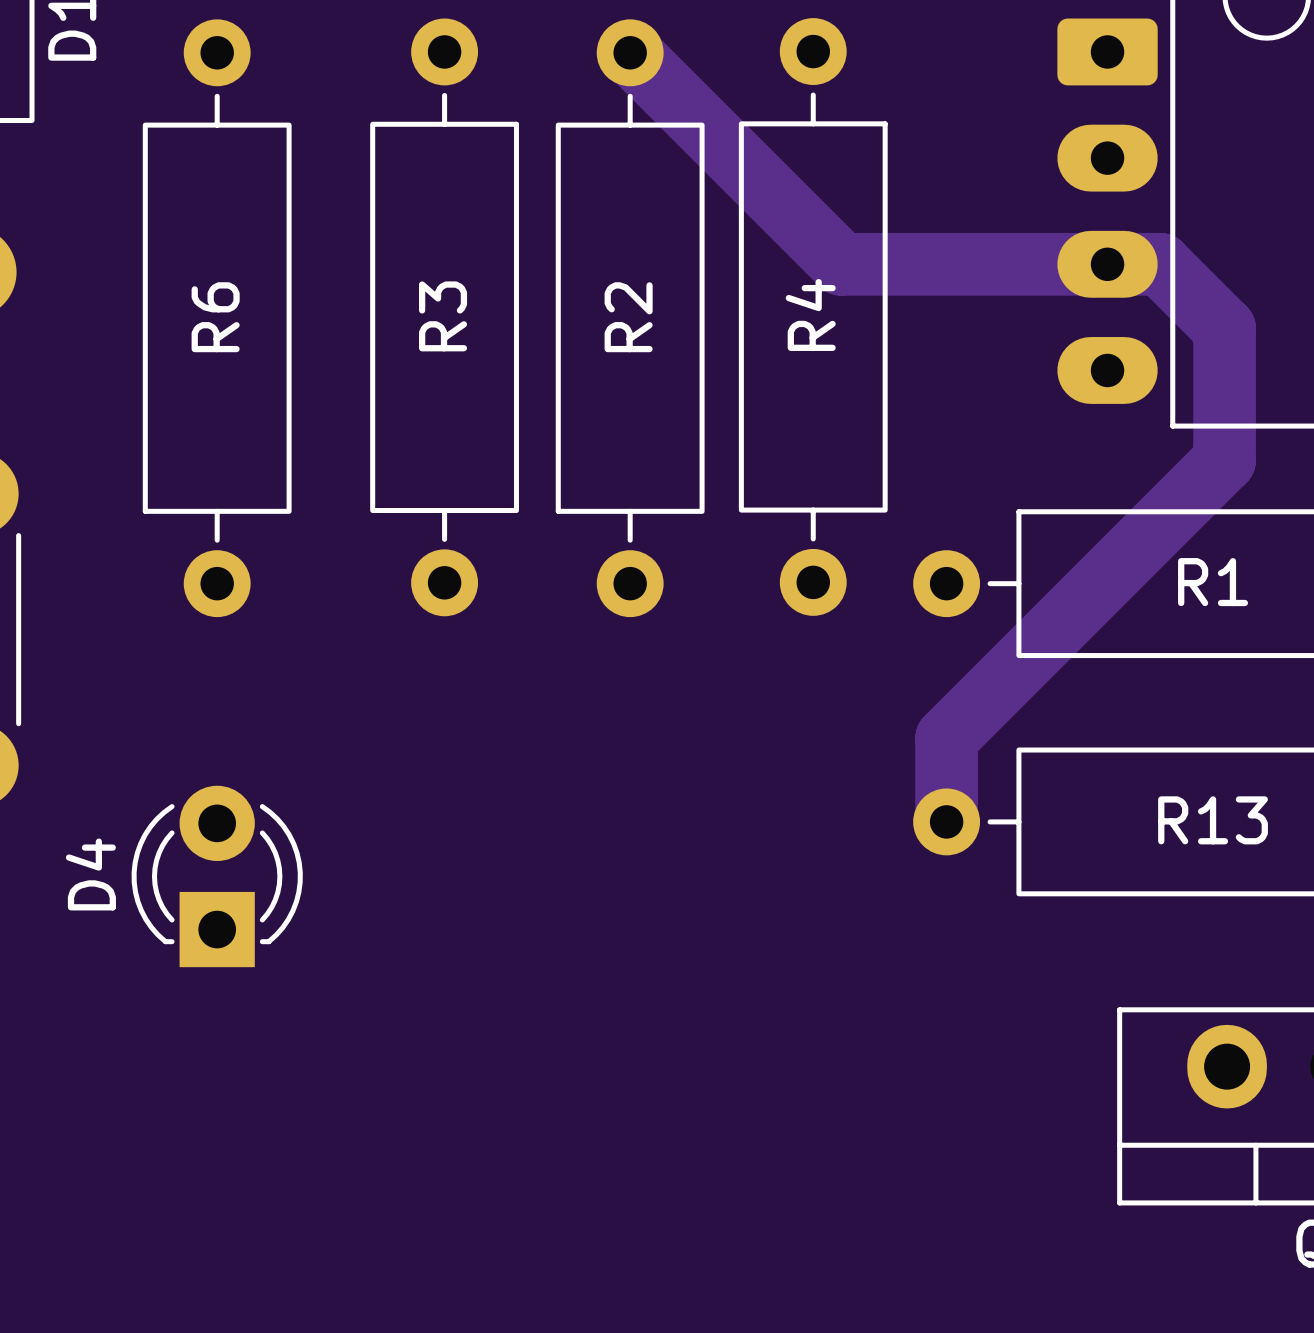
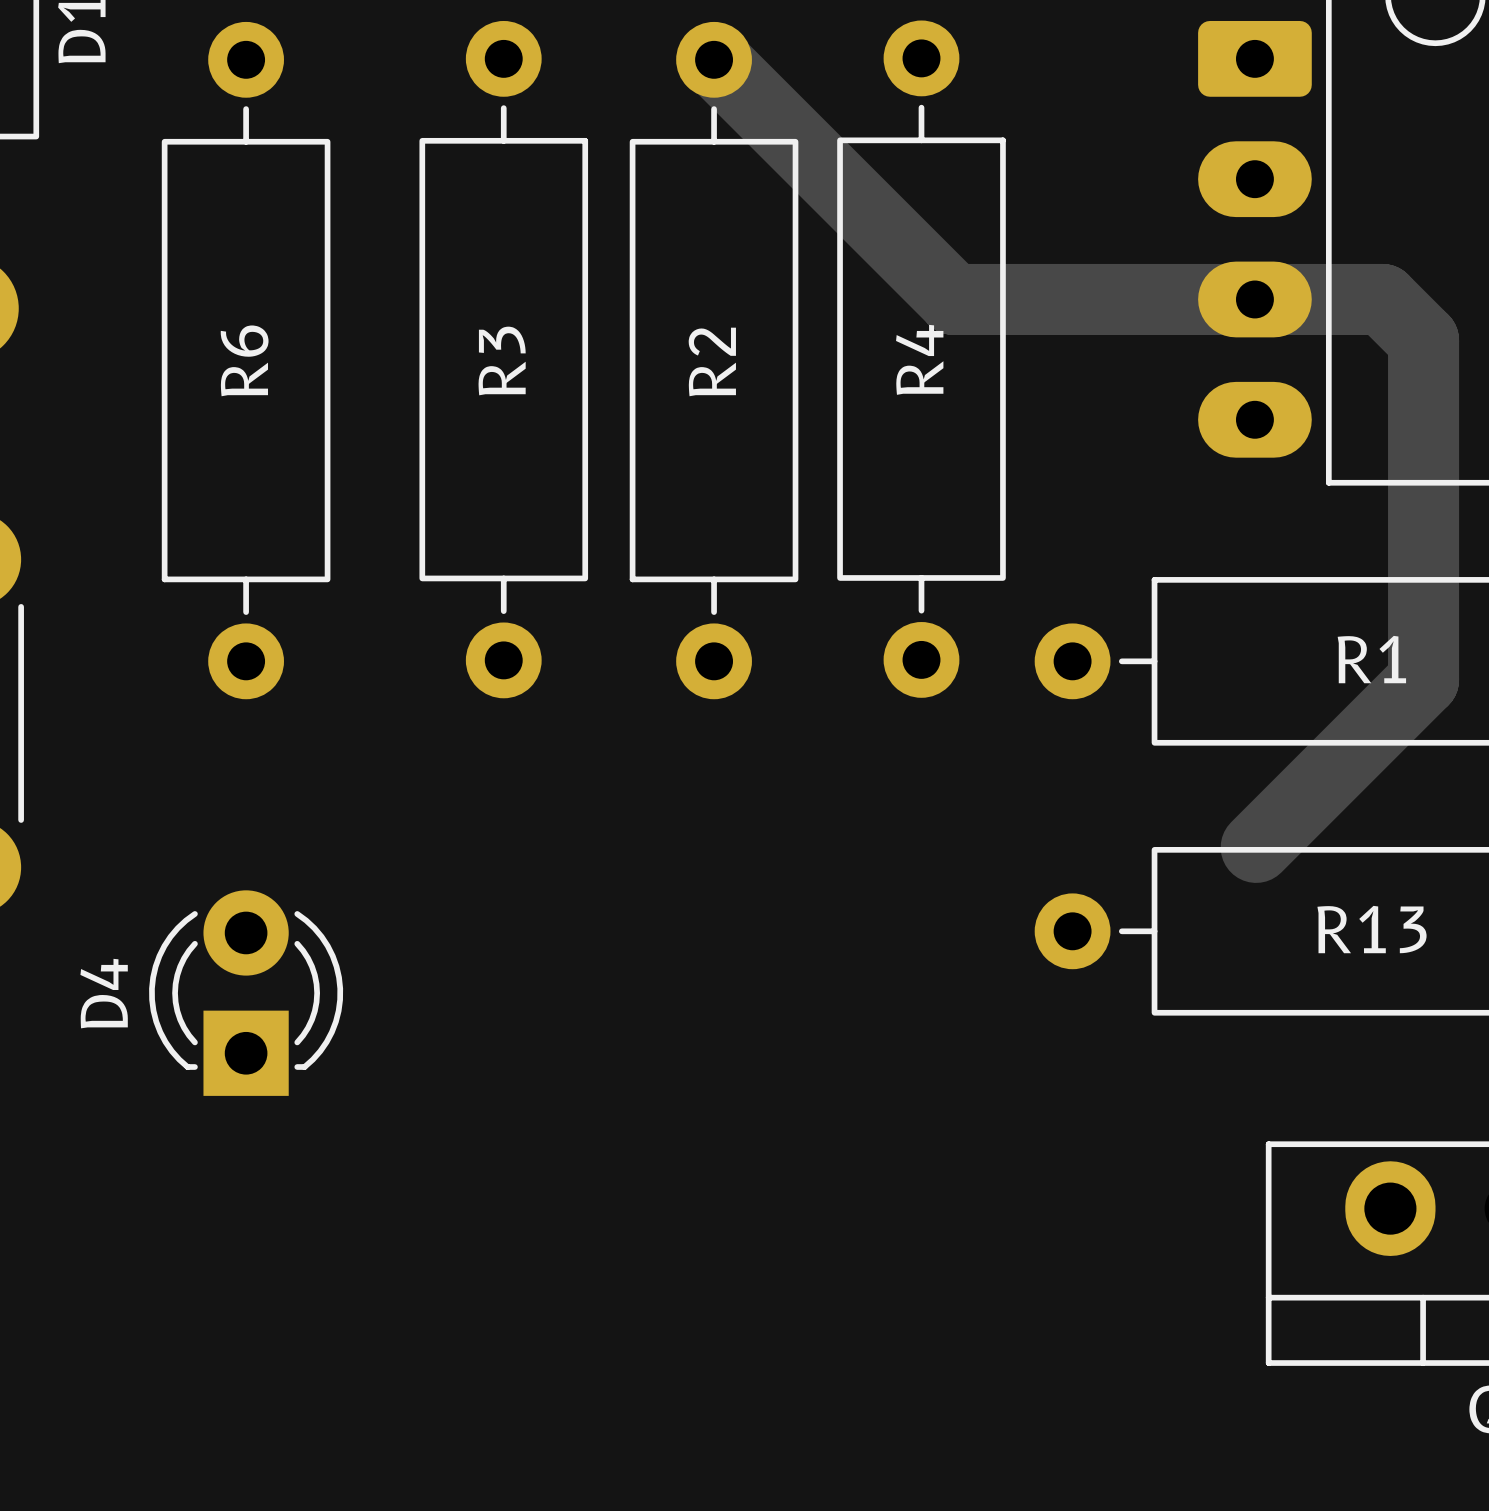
track: (1160, 264) (1224, 328) (1224, 460) (946, 738) (946, 821) -> (1314, 299) (1382, 299) (1423, 340) (1423, 680) (1256, 847)

